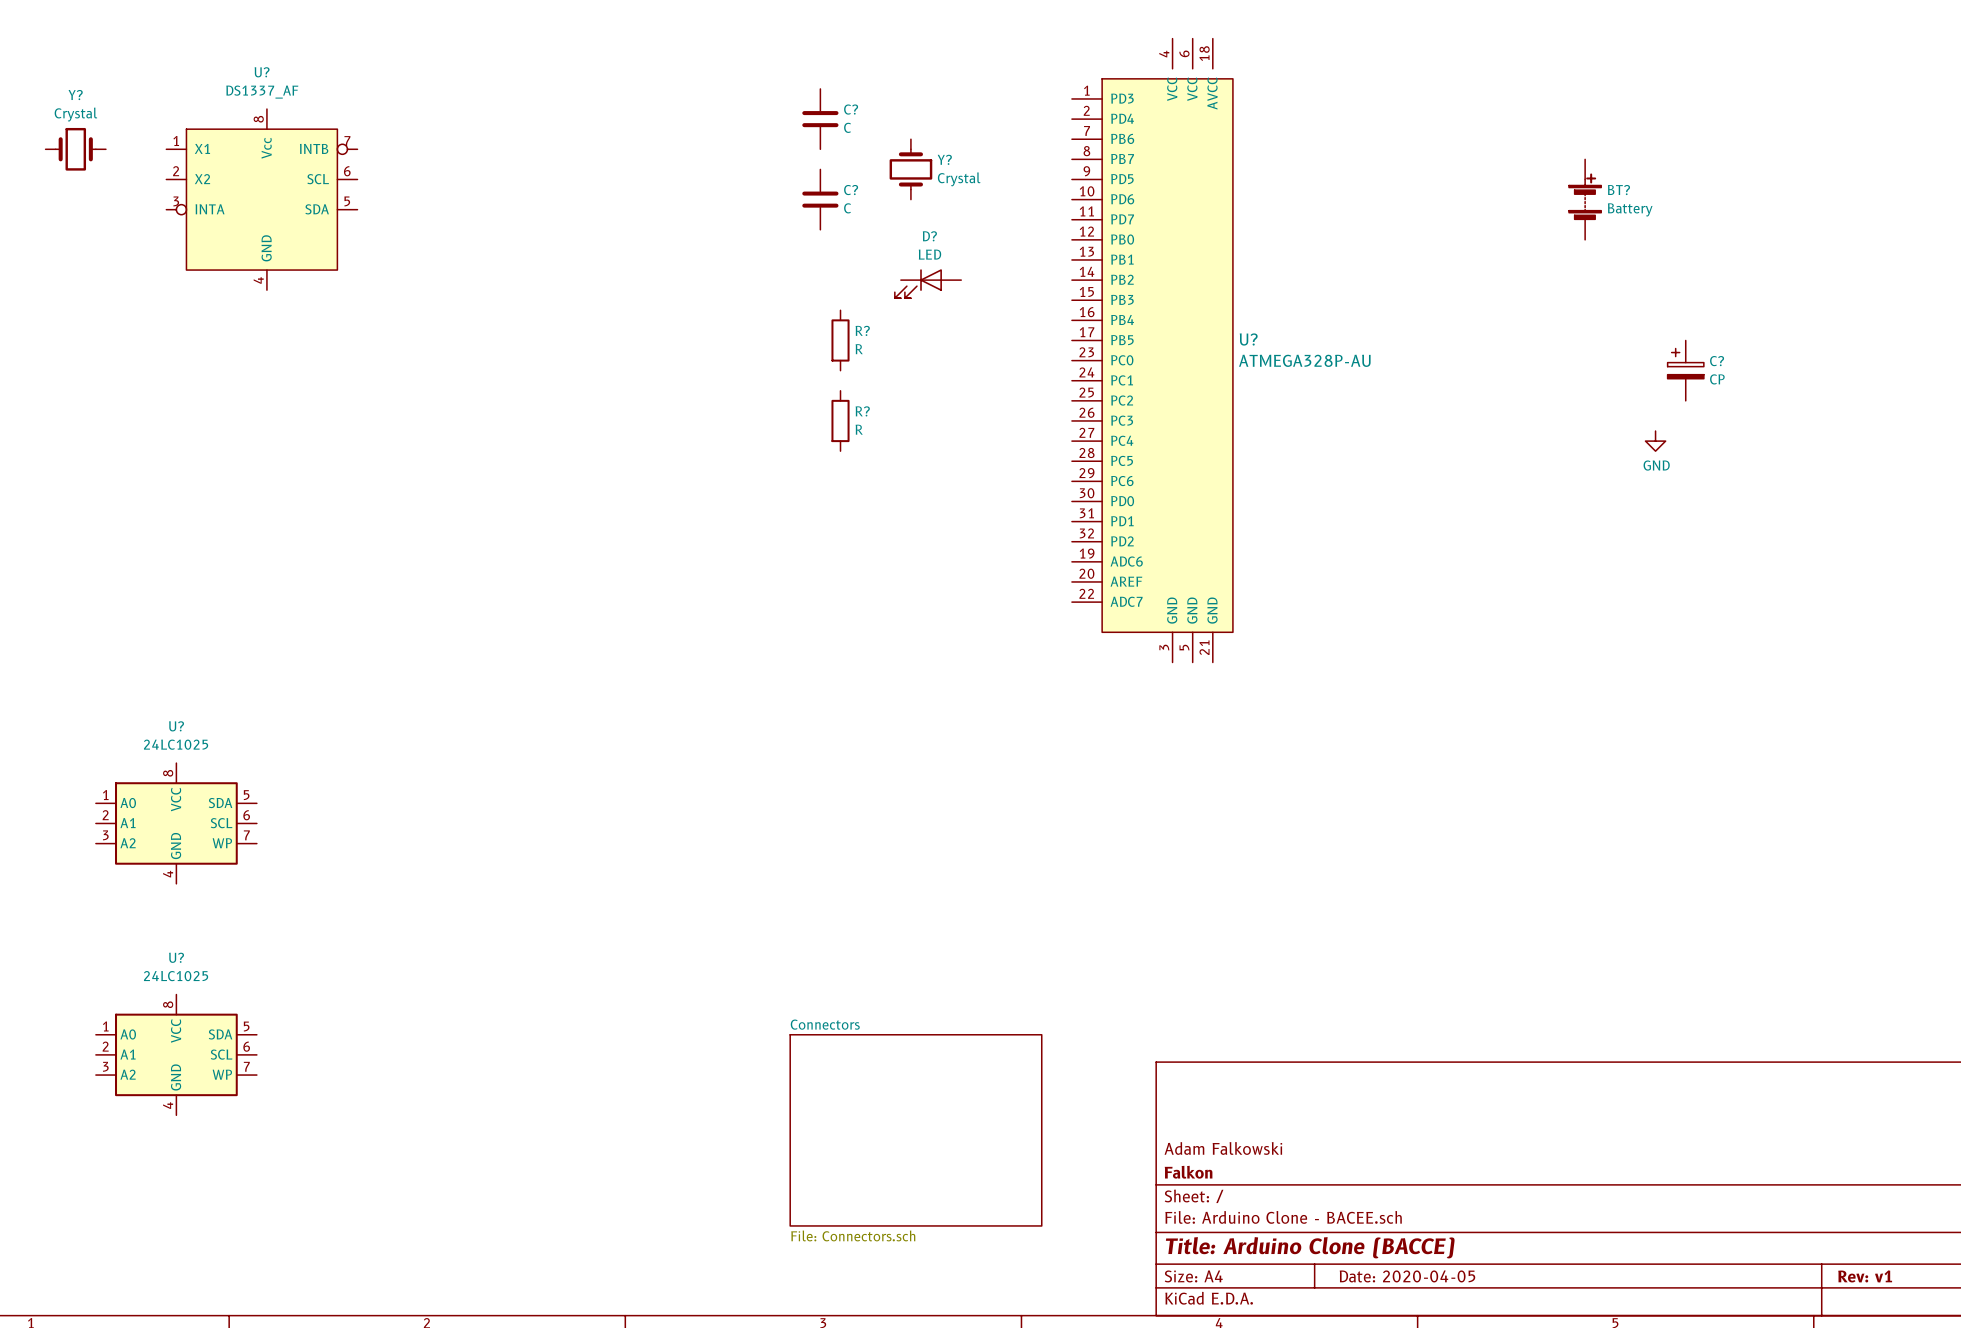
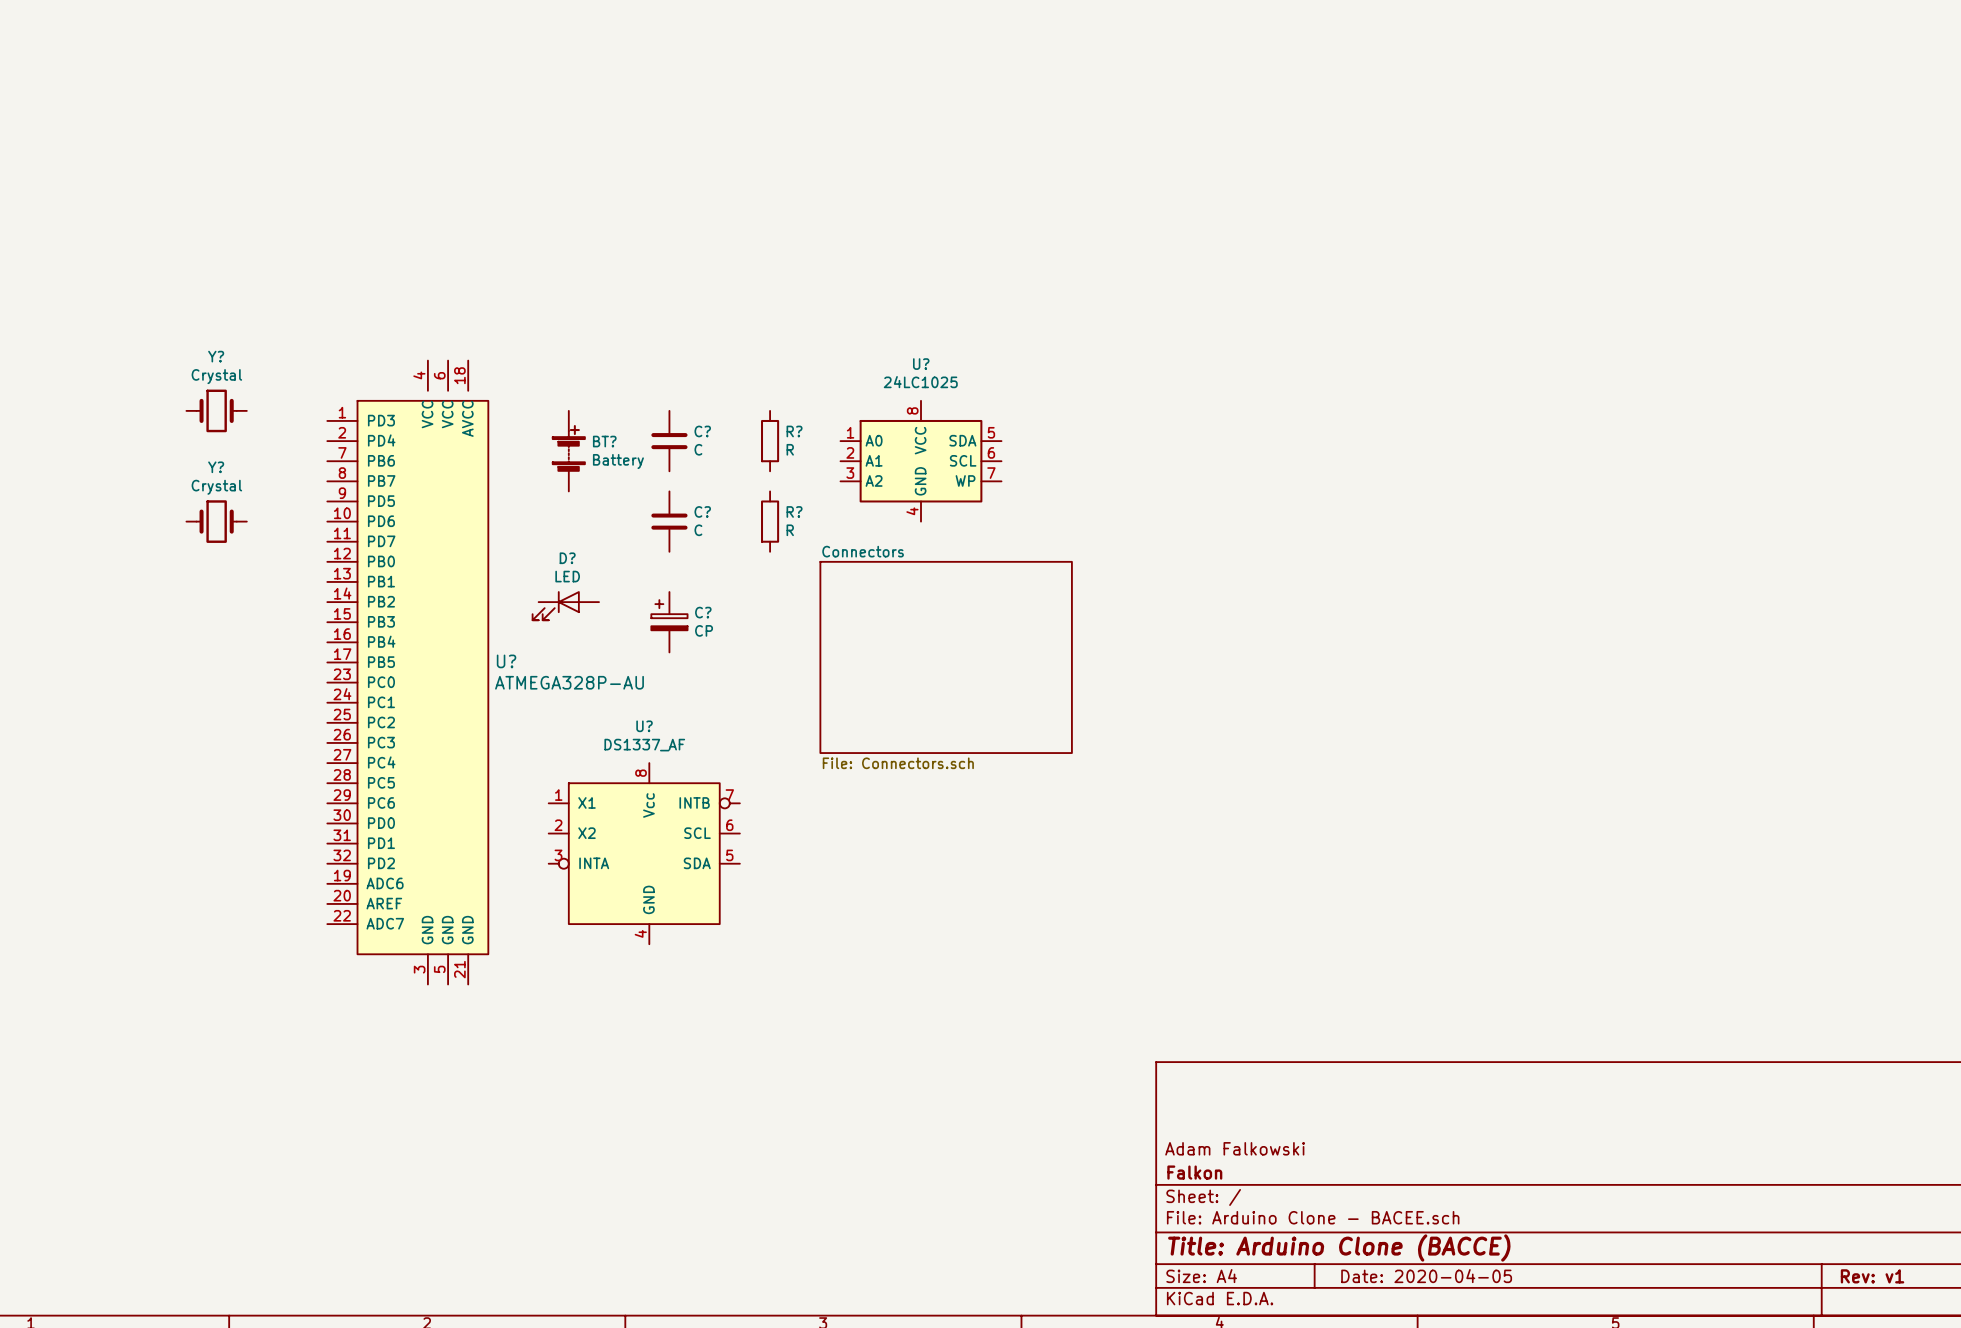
C?: C (820, 119) -> none
Y?: Crystal (75, 149) -> none
Y?: Crystal (910, 169) -> none
U?: DS1337_AF (261, 199) -> none
C?: C (820, 199) -> none
BT?: Battery (1585, 199) -> none
D?: LED (928, 283) -> none
R?: R (840, 340) -> none
U?: ATMEGA328P-AU (1152, 350) -> none
C?: CP (1685, 370) -> none
Y?: none -> Crystal (216, 410)
R?: R (840, 420) -> none
C?: none -> C (669, 441)
R?: none -> R (770, 441)
power symbol: GND (1655, 441) -> none
BT?: none -> Battery (568, 451)
U?: none -> 24LC1025 (921, 461)
Y?: none -> Crystal (216, 521)
C?: none -> C (669, 521)
R?: none -> R (770, 521)
D?: none -> LED (565, 605)
C?: none -> CP (669, 622)
sheet Connectors: none -> File: Connectors.sch (946, 657)
U?: none -> ATMEGA328P-AU (407, 672)
U?: 24LC1025 (176, 823) -> none
U?: none -> DS1337_AF (644, 853)
U?: 24LC1025 (176, 1054) -> none
sheet Connectors: File: Connectors.sch (915, 1130) -> none

